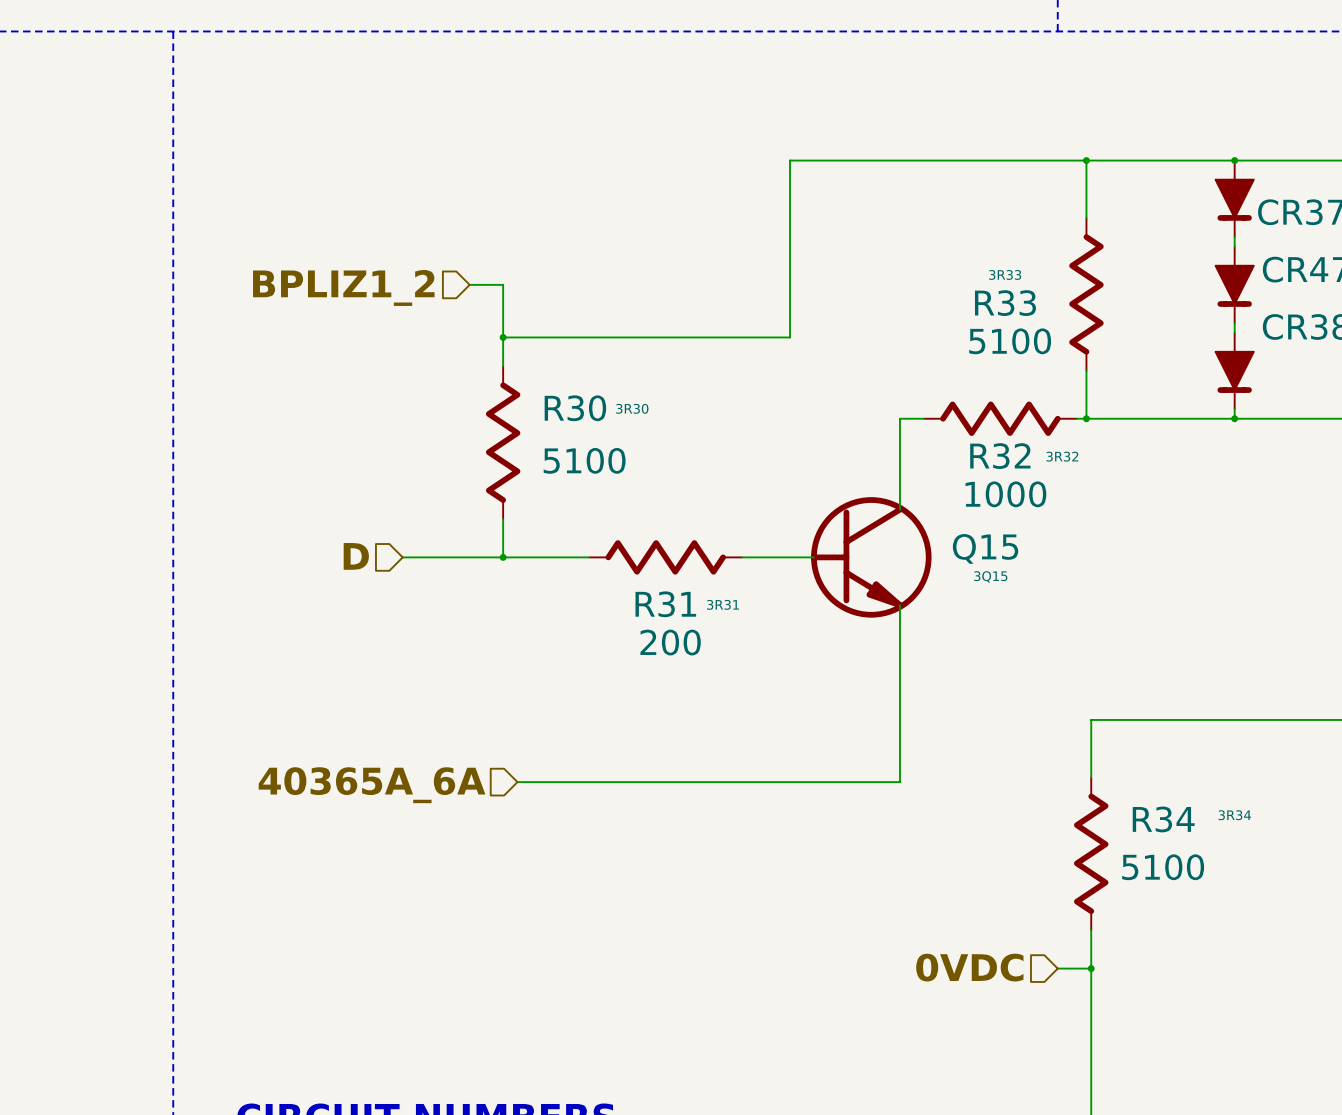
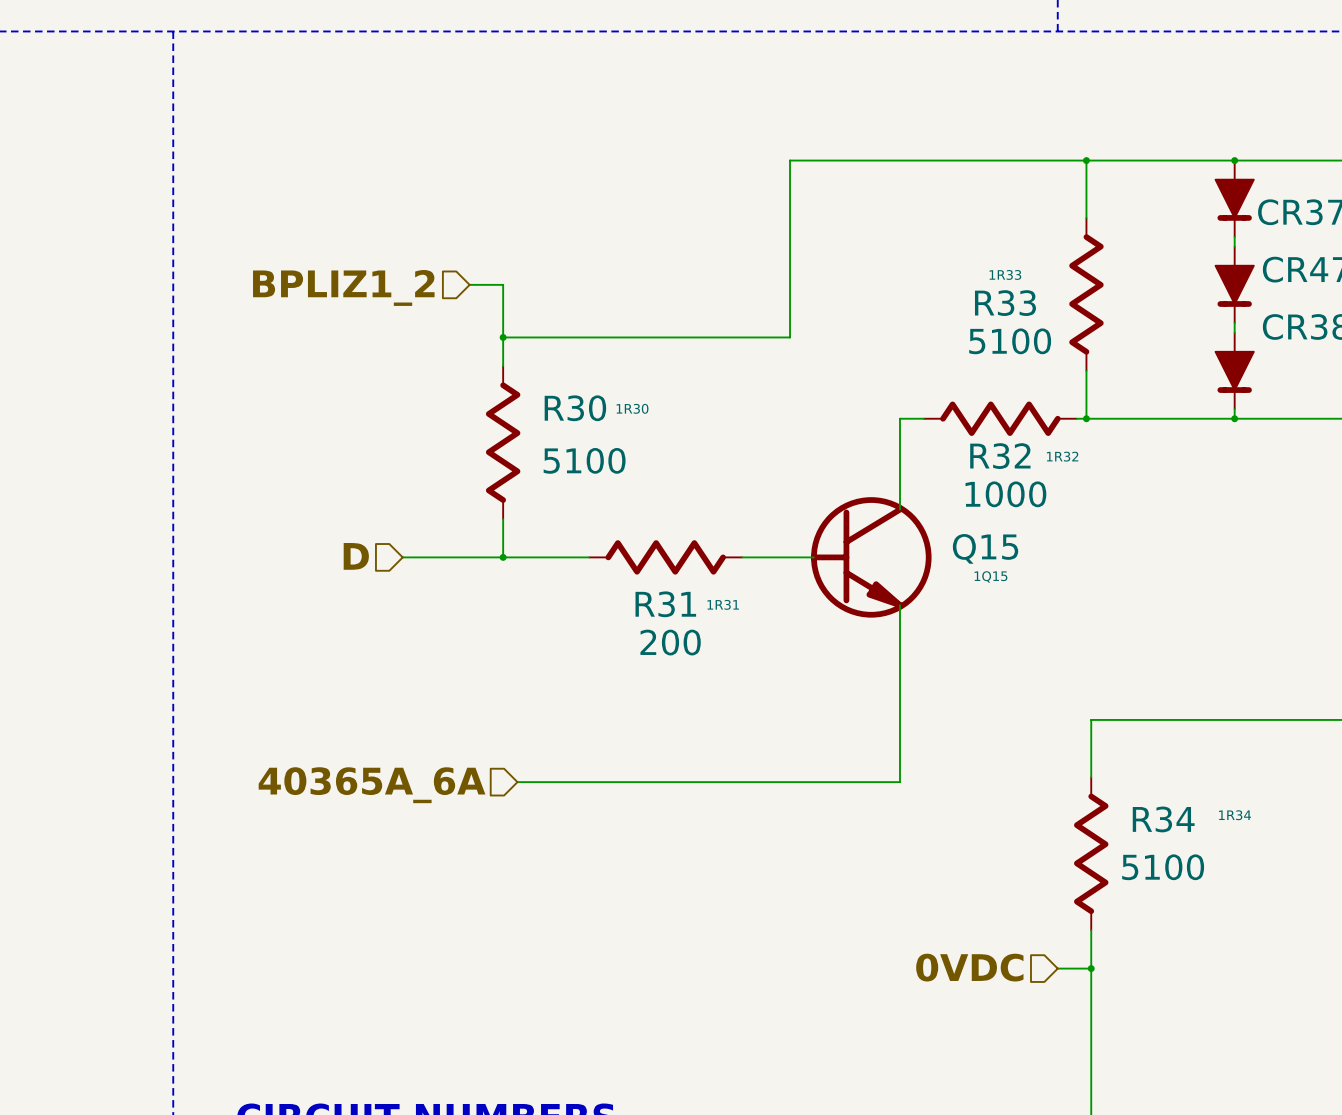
3R33 name: 3R33 (1005, 274) -> 1R33 (1005, 274)
3R30 name: 3R30 (632, 408) -> 1R30 (632, 408)
3R32 name: 3R32 (1062, 456) -> 1R32 (1062, 456)
3Q15 name: 3Q15 (990, 576) -> 1Q15 (990, 576)
3R31 name: 3R31 (722, 604) -> 1R31 (723, 604)
3R34 name: 3R34 (1234, 815) -> 1R34 (1235, 815)

